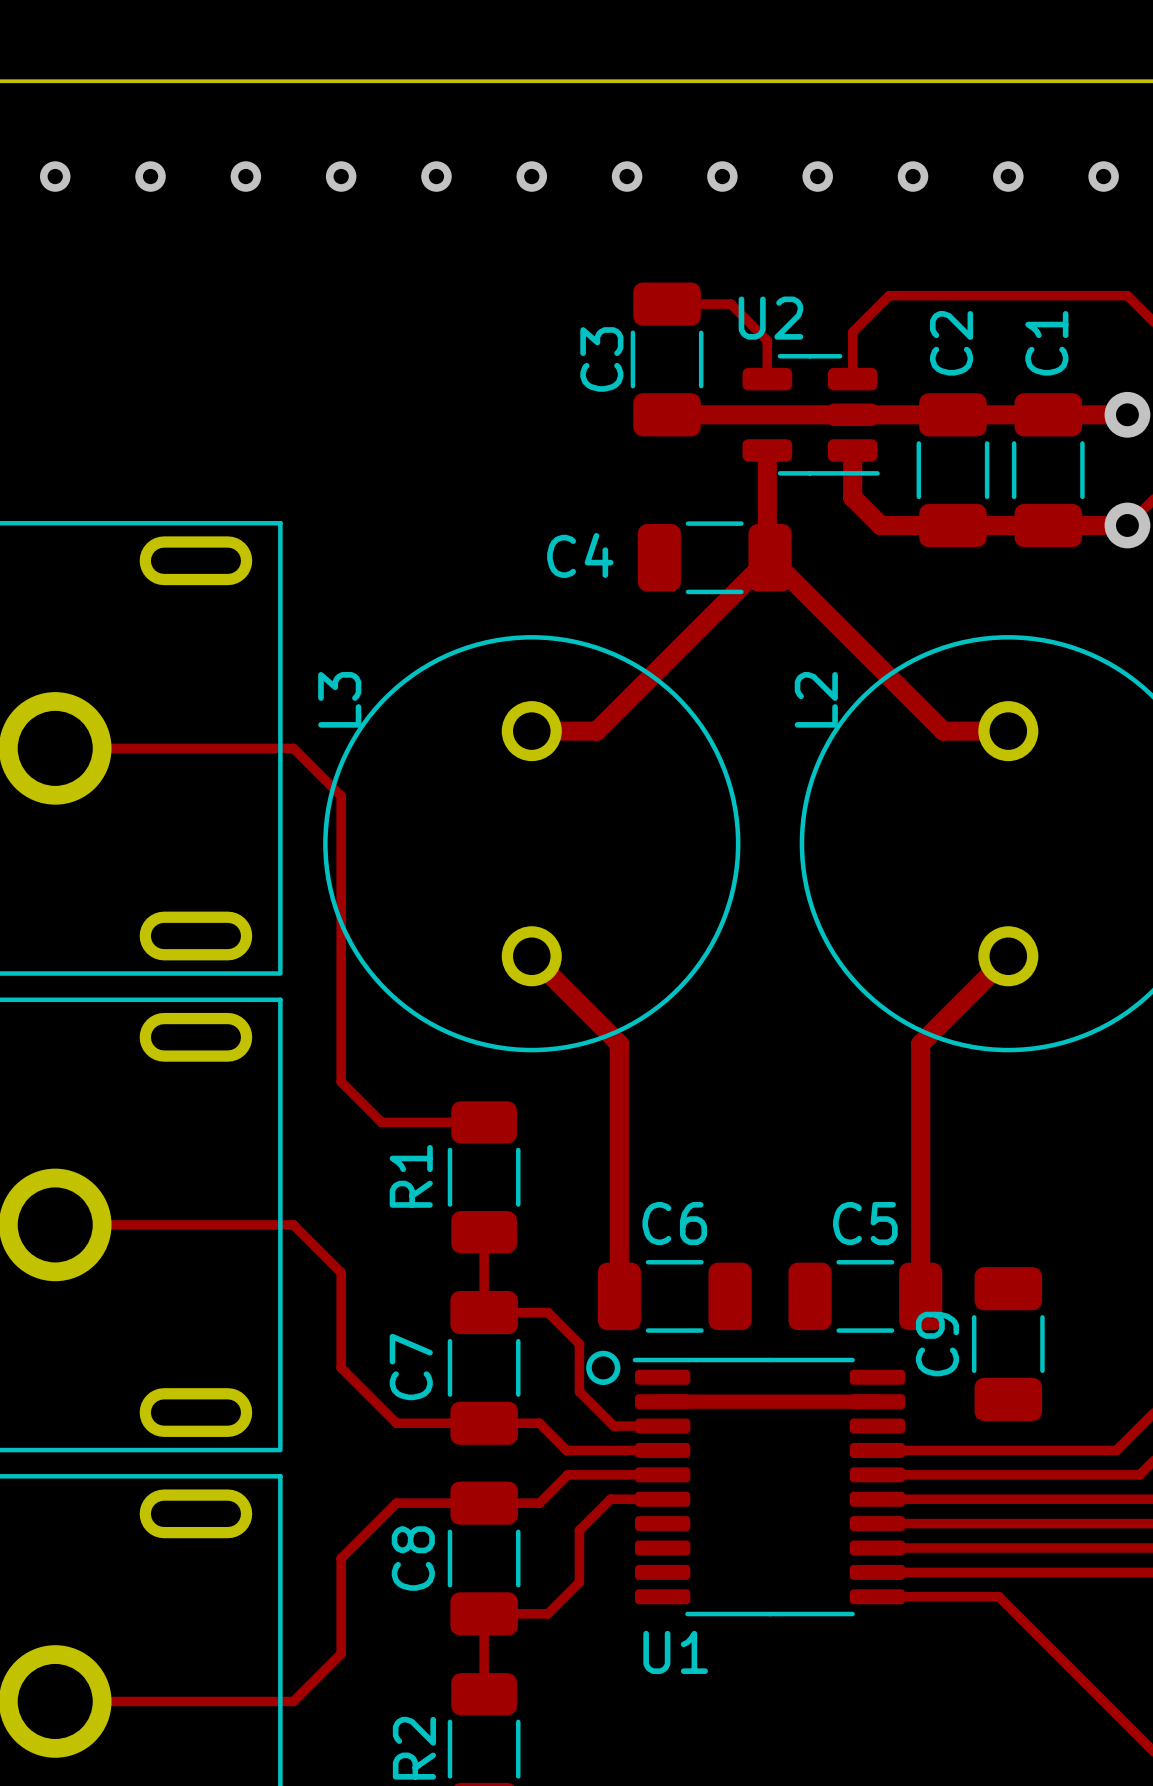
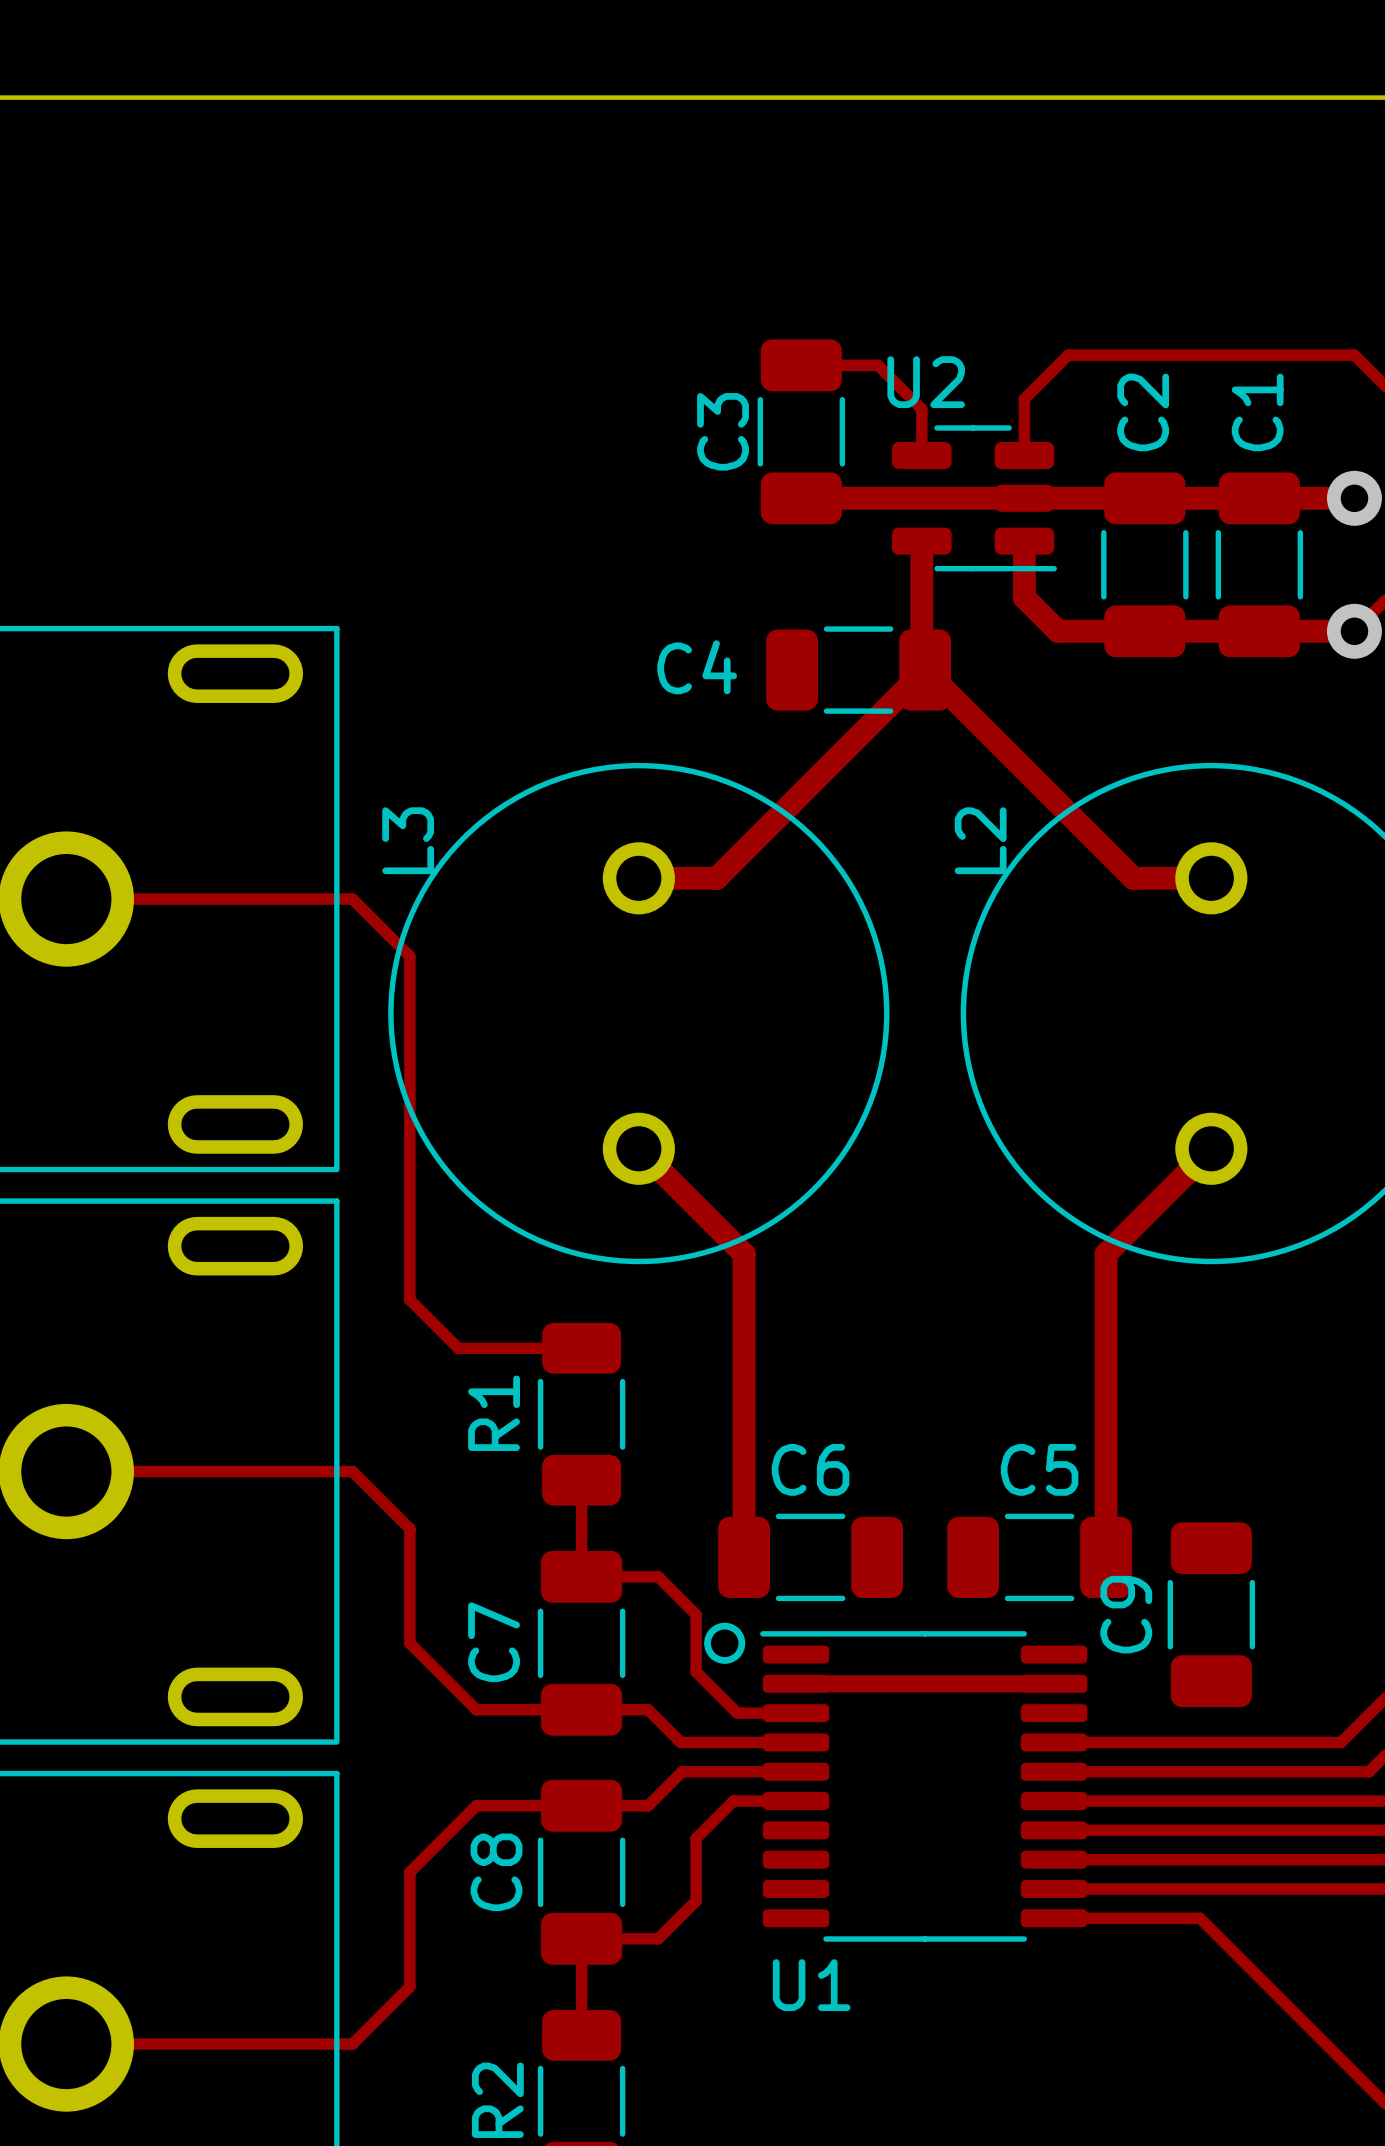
via: (55, 176) -> none
via: (150, 176) -> none
via: (245, 176) -> none
via: (341, 176) -> none
via: (436, 176) -> none
via: (531, 176) -> none
via: (627, 176) -> none
via: (722, 176) -> none
via: (817, 176) -> none
via: (913, 176) -> none
via: (1008, 176) -> none
via: (1103, 176) -> none

